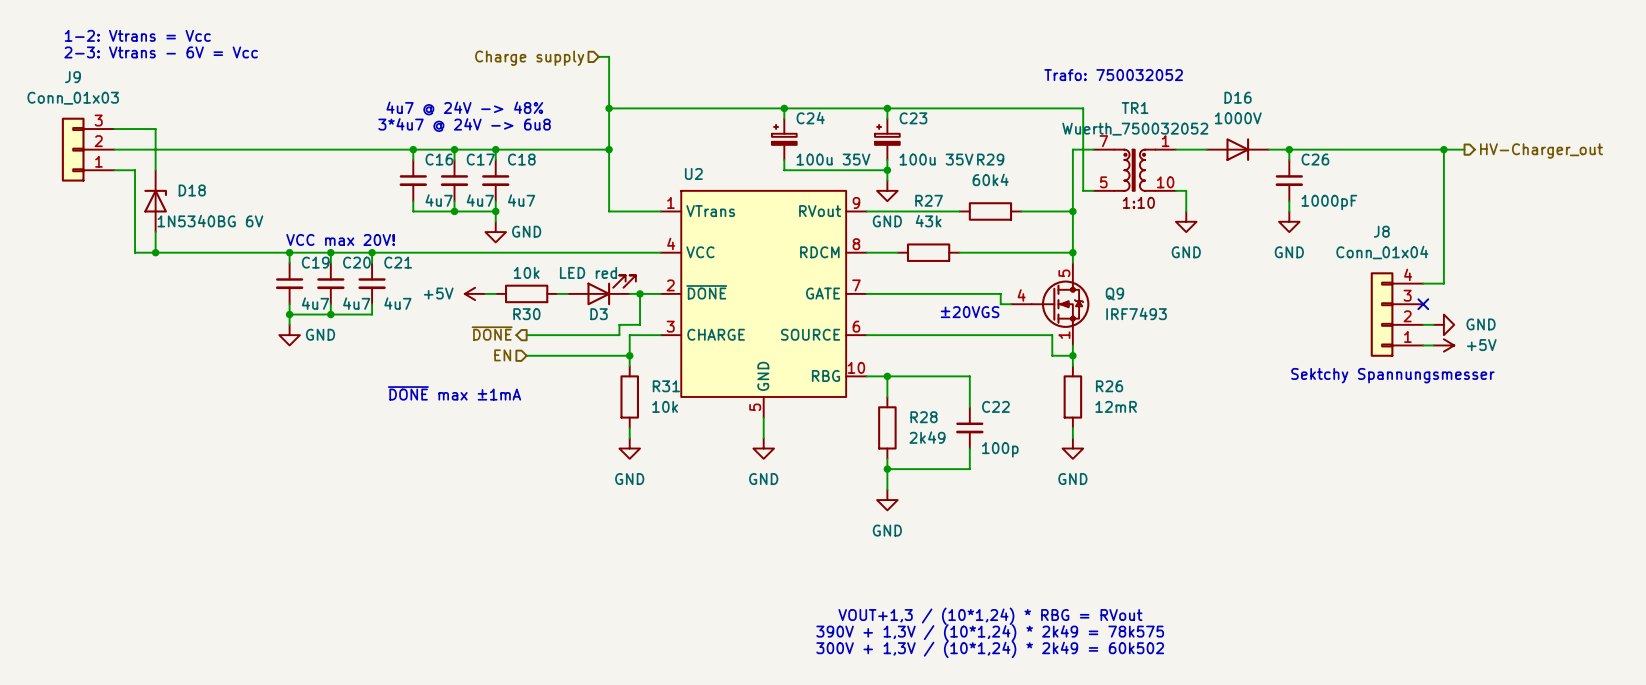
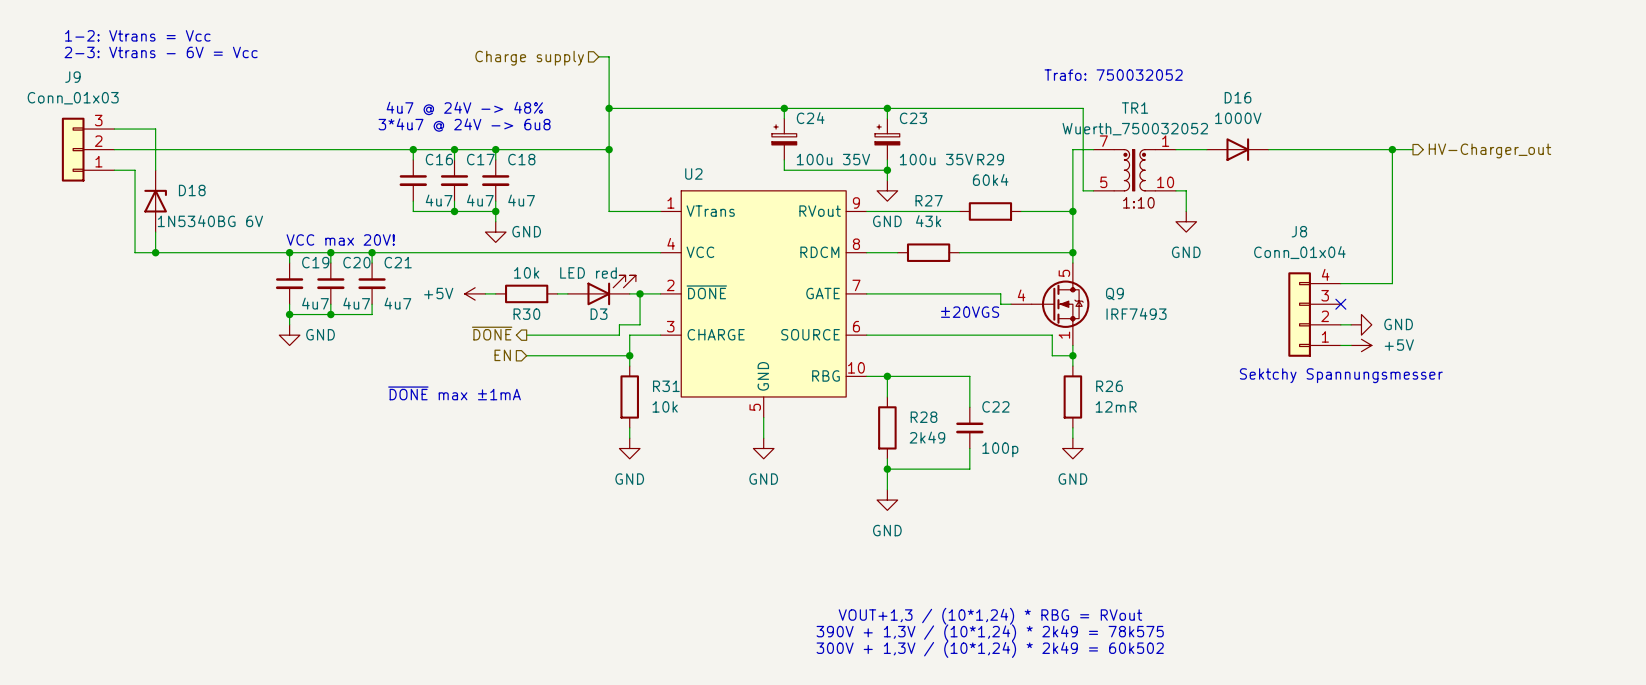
wire: (1289, 149) (1289, 159) -> none
junction: (1289, 149) -> none
wire: none -> (1392, 149) (1392, 283) (1340, 283)
junction: none -> (1392, 149)
wire: (1412, 149) (1464, 149) -> none
wire: (1443, 149) (1443, 283) (1423, 283) -> none
junction: (1443, 149) -> none
hierarchical label position: HV-Charger_out (1541, 150) -> HV-Charger_out (1489, 150)
C26: 1000pF (1289, 180) -> none
wire: (1289, 201) (1289, 211) -> none
power symbol: GND (1289, 221) -> none
no-connect mark: none -> (1340, 304)
no-connect mark: (1423, 304) -> none
J8 position: (1397, 314) -> (1314, 314)
power symbol: none -> GND (1361, 324)
wire: (1423, 324) (1433, 324) -> (1340, 324) (1351, 324)
power symbol: GND (1443, 324) -> none
wire: (1423, 345) (1433, 345) -> (1340, 345) (1351, 345)
power symbol position: +5V (1443, 345) -> +5V (1361, 345)
text position: Sektchy Spannungsmesser (1392, 375) -> Sektchy Spannungsmesser (1341, 375)

